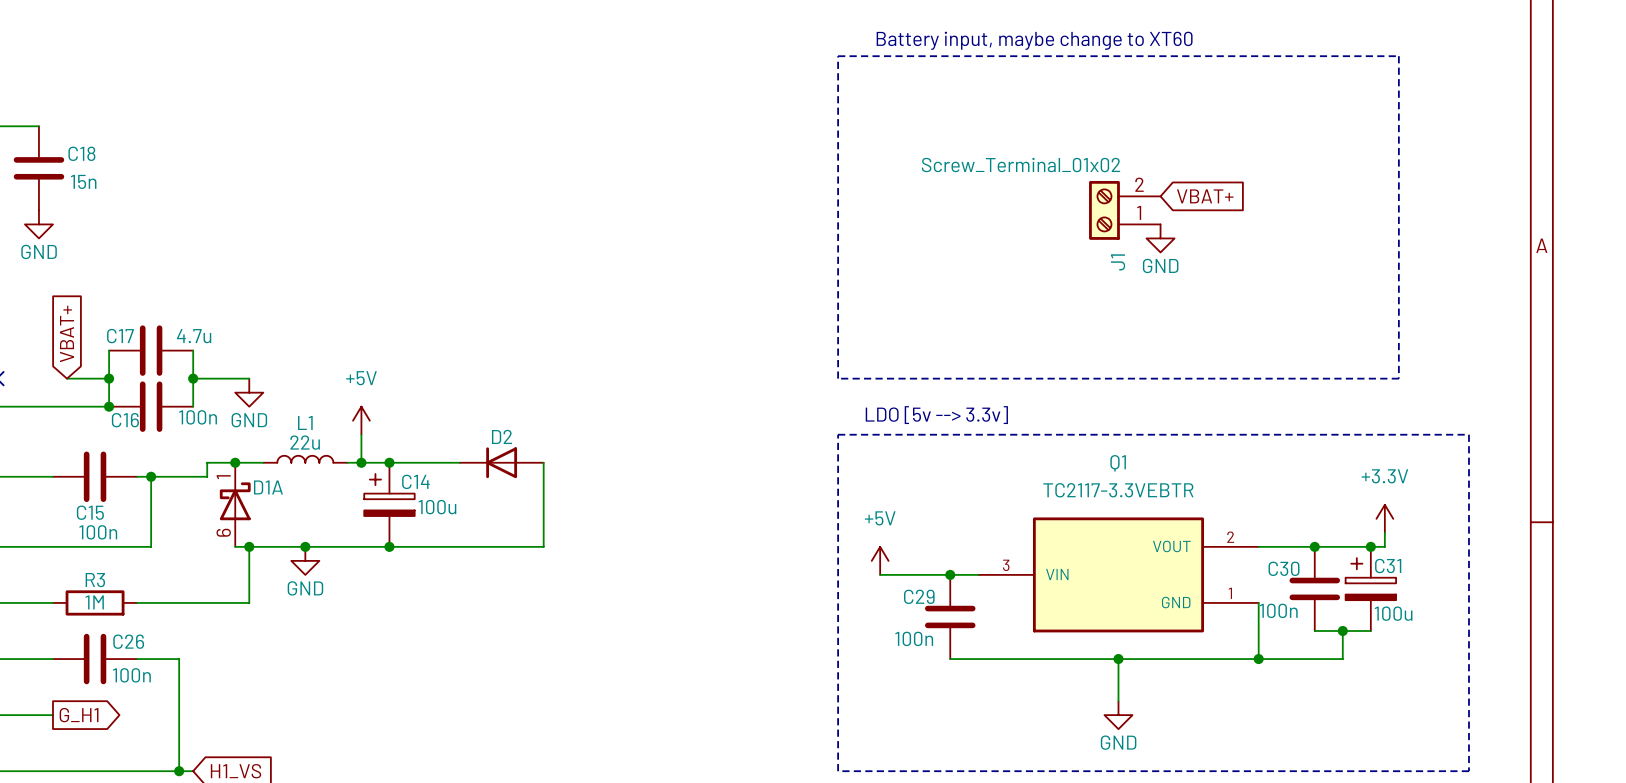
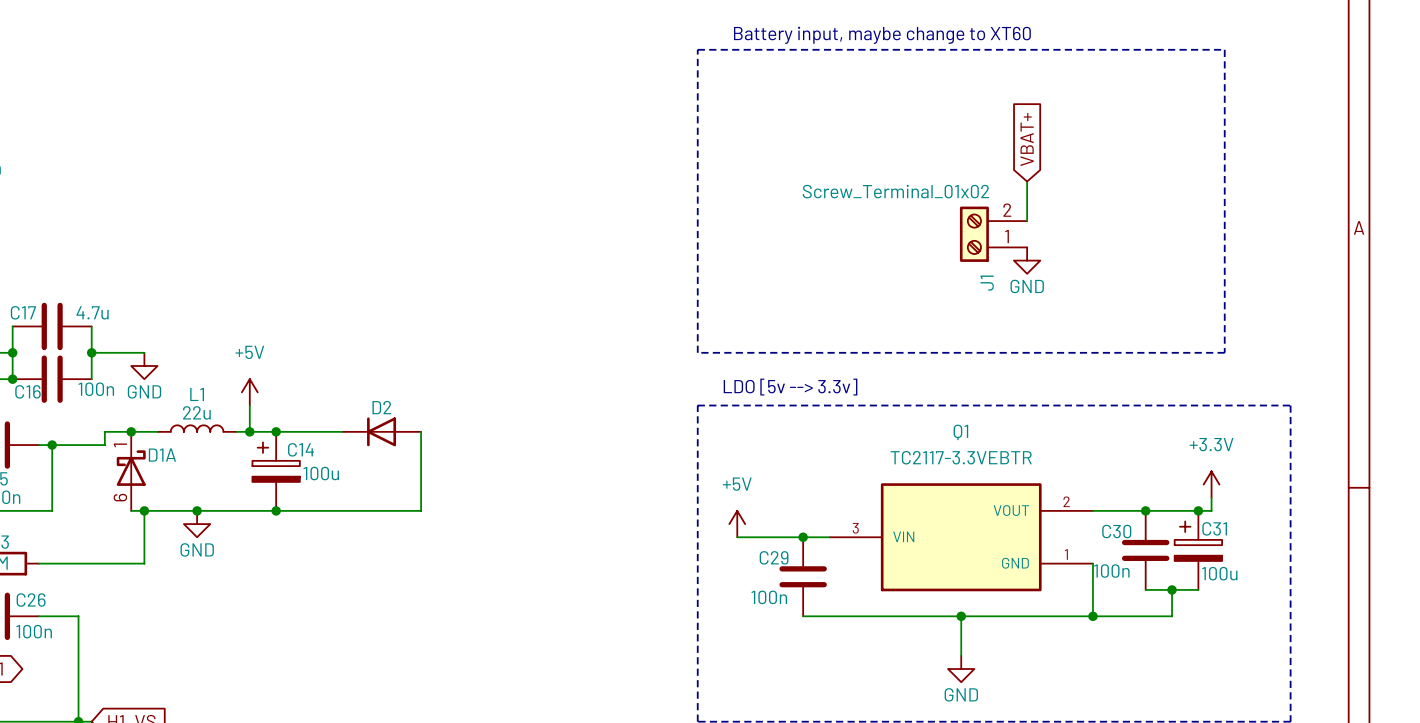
wire: none -> (1027, 181) (1027, 221)
global label rotation: 0° (1205, 196) -> 90° counterclockwise (1027, 139)
J1 position: (1124, 210) -> (993, 234)
power symbol position: GND (1160, 238) -> GND (1027, 260)

